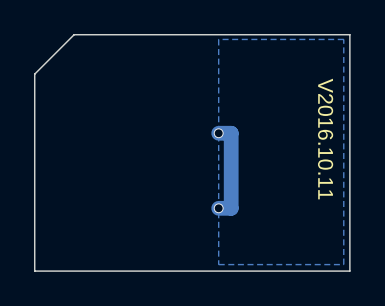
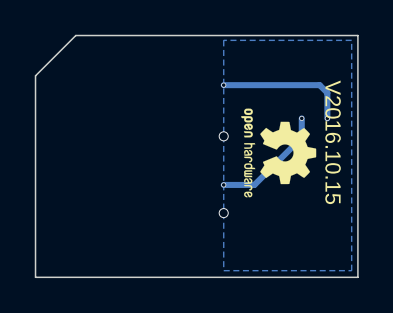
track: none -> (223, 85) (319, 85) (327, 92) (327, 118)
via: none -> (223, 85)
drawing: none -> [241, 108, 317, 198]
track: none -> (301, 118) (301, 137) (254, 184) (223, 184)
via: none -> (301, 118)
via: none -> (327, 118)
track: (218, 133) (231, 133) (231, 208) (218, 208) -> none
text: V2016.10.11 (325, 139) -> V2016.10.15 (333, 142)
via: none -> (223, 184)

